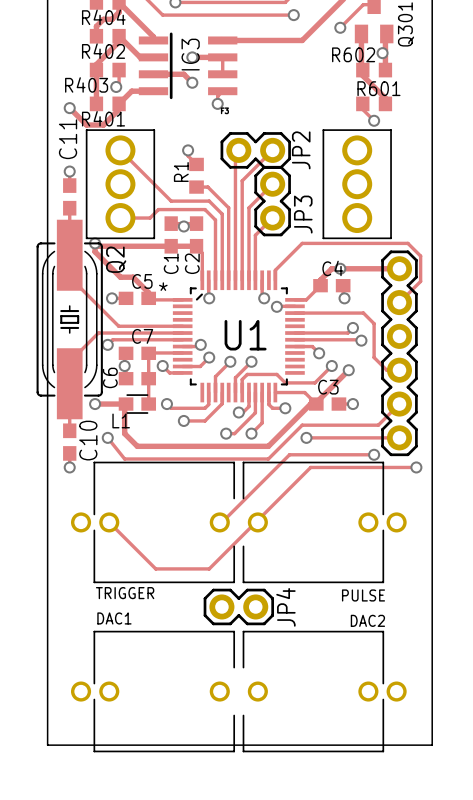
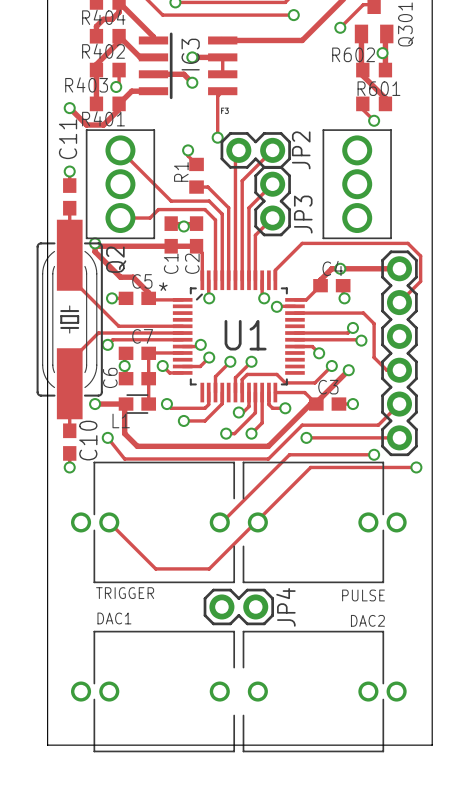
track: none -> (217, 103) (217, 137)
via position: (217, 103) -> (217, 137)

